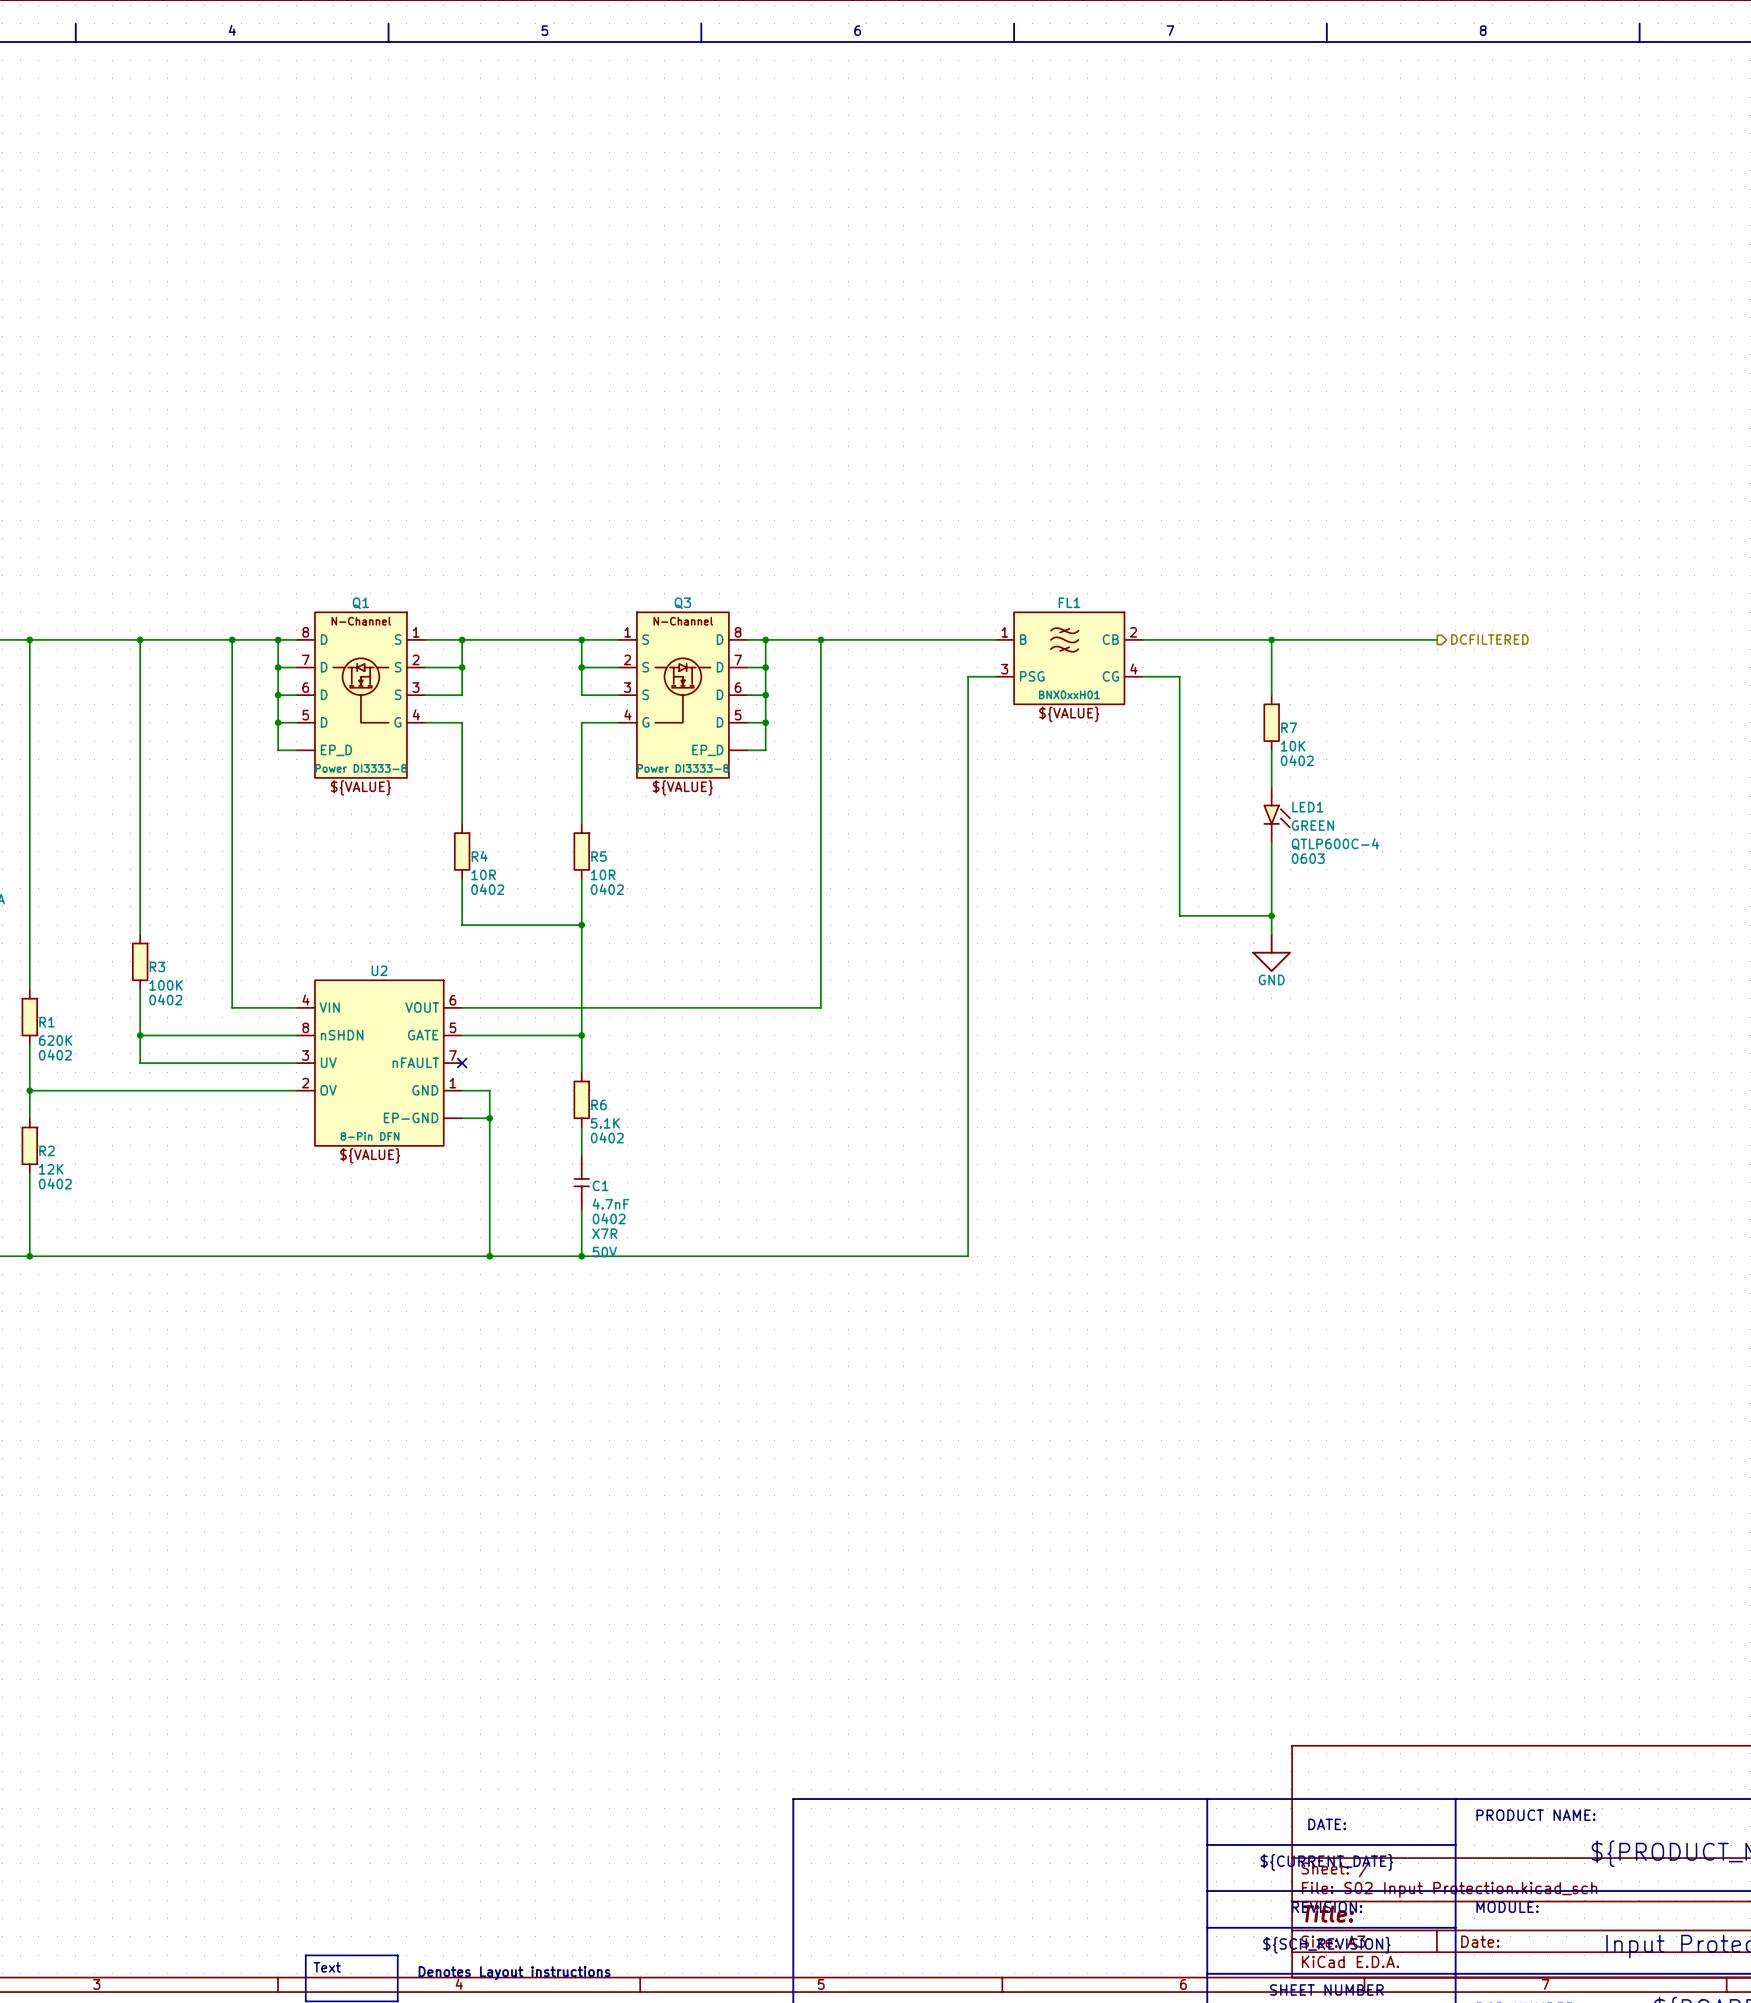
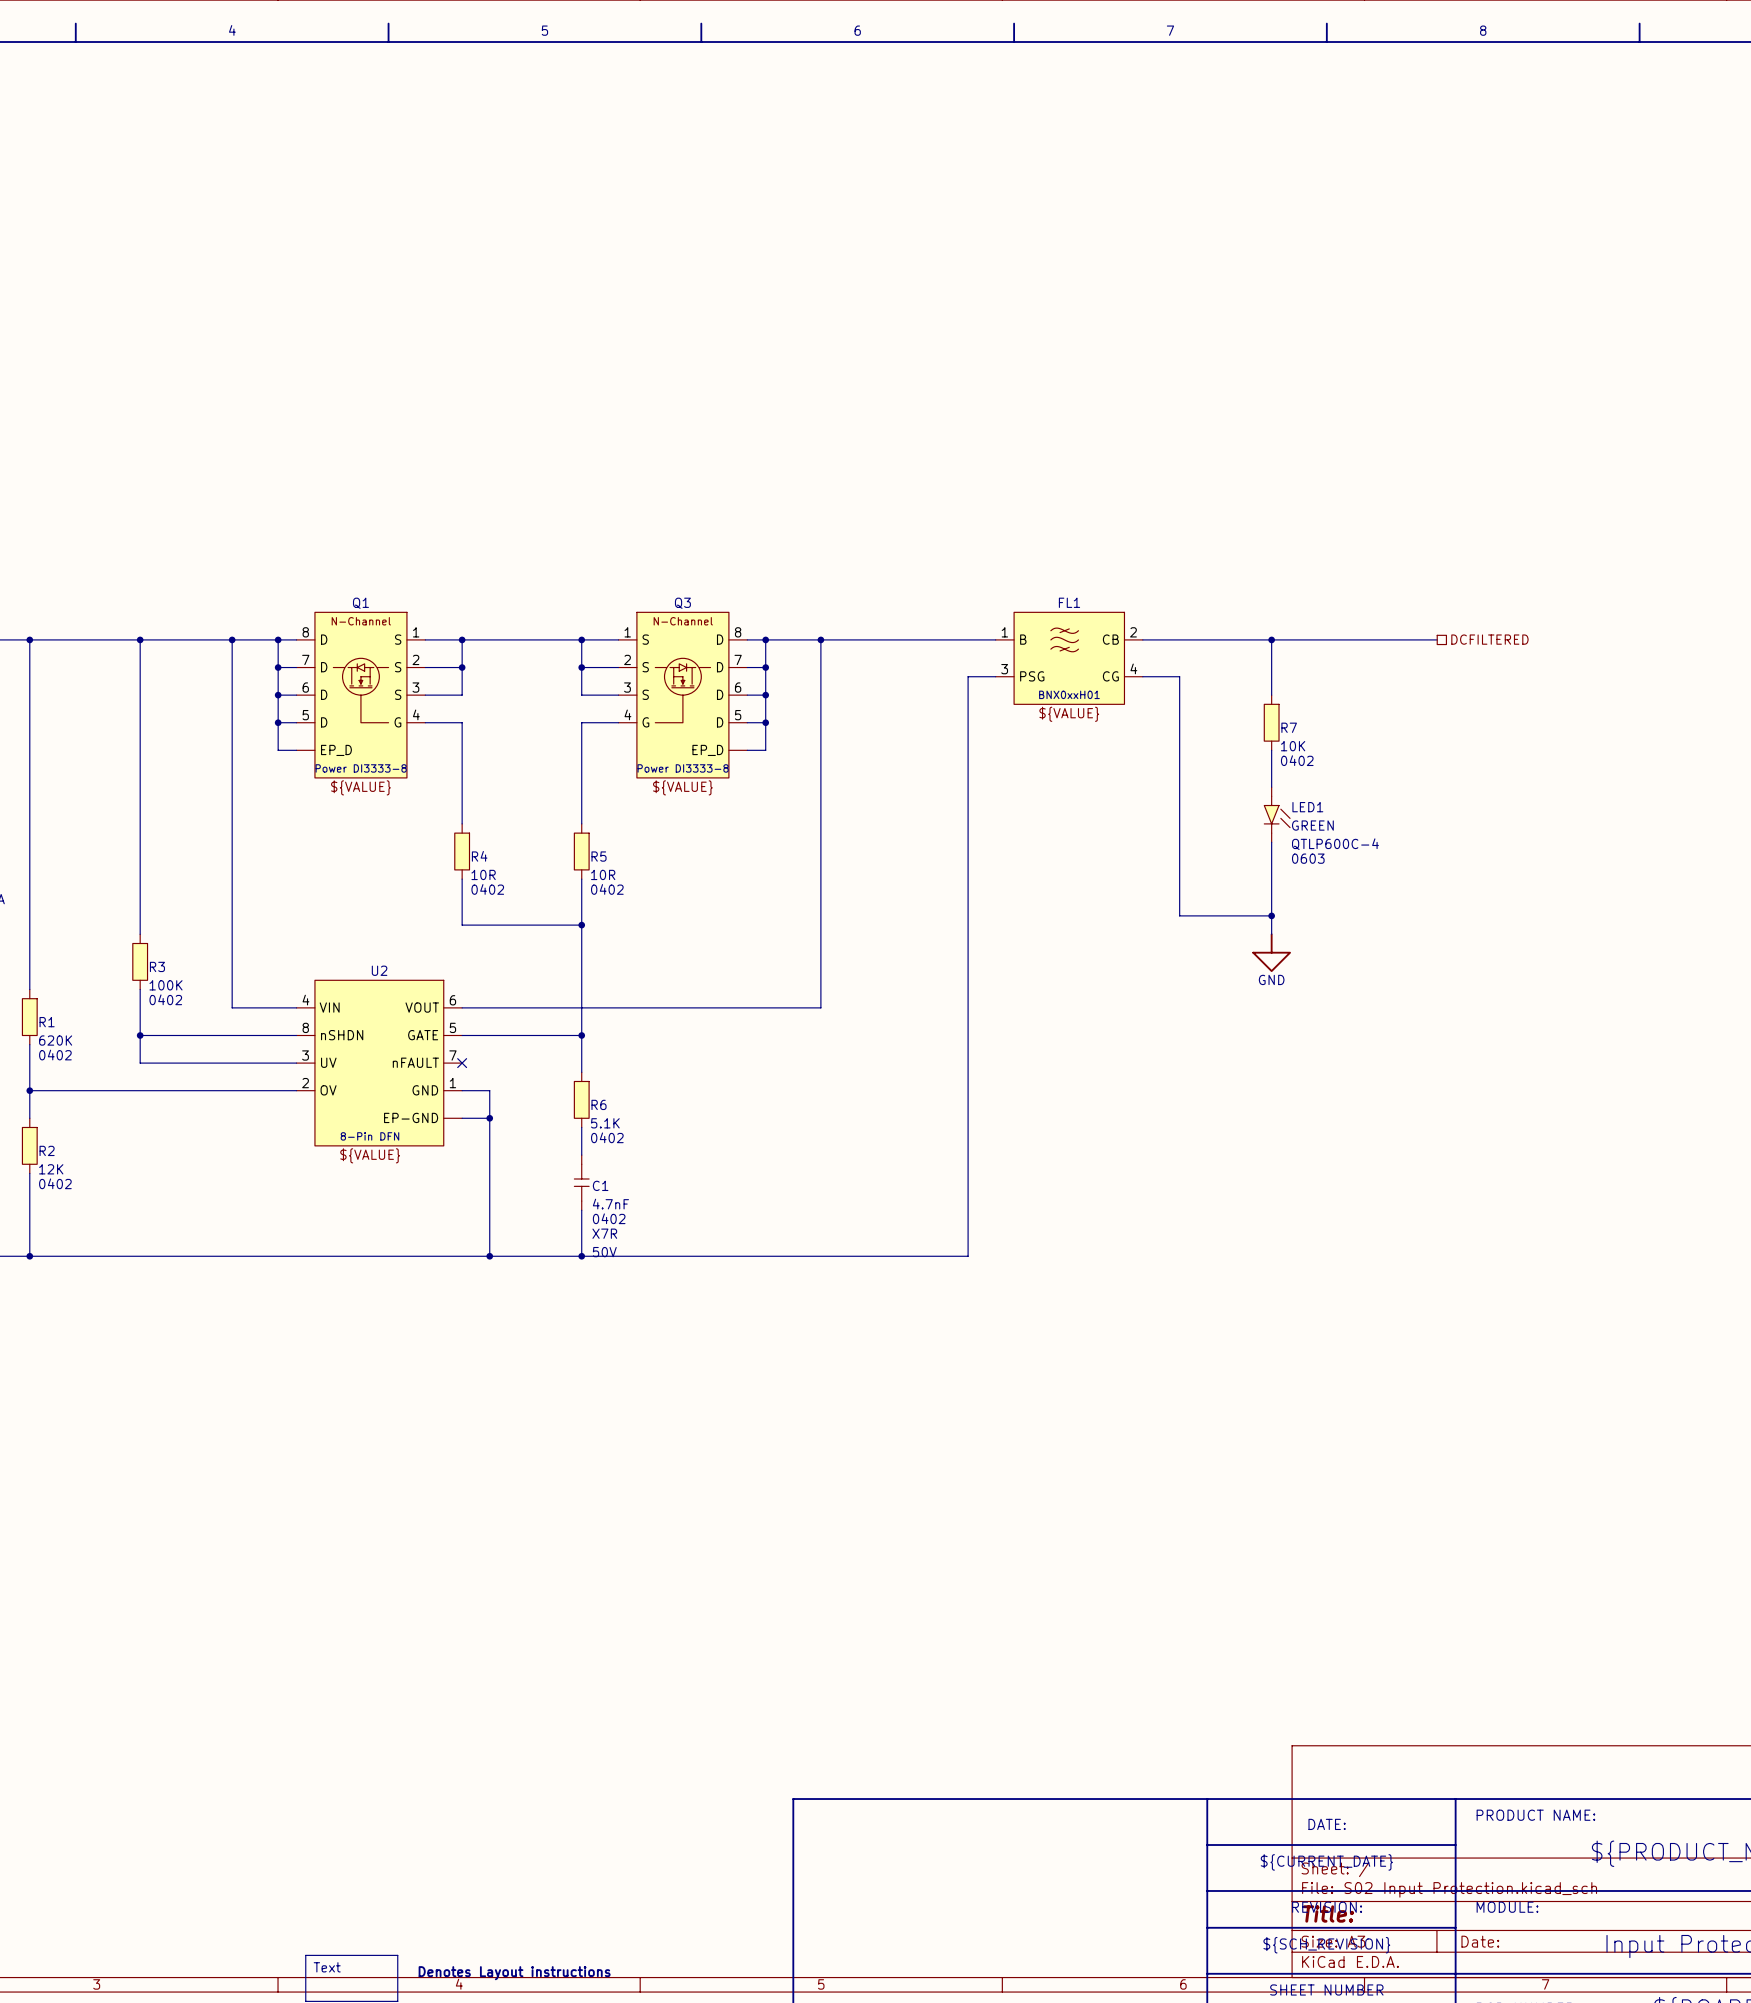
hierarchical label shape: output (1489, 639) -> passive (1489, 639)

